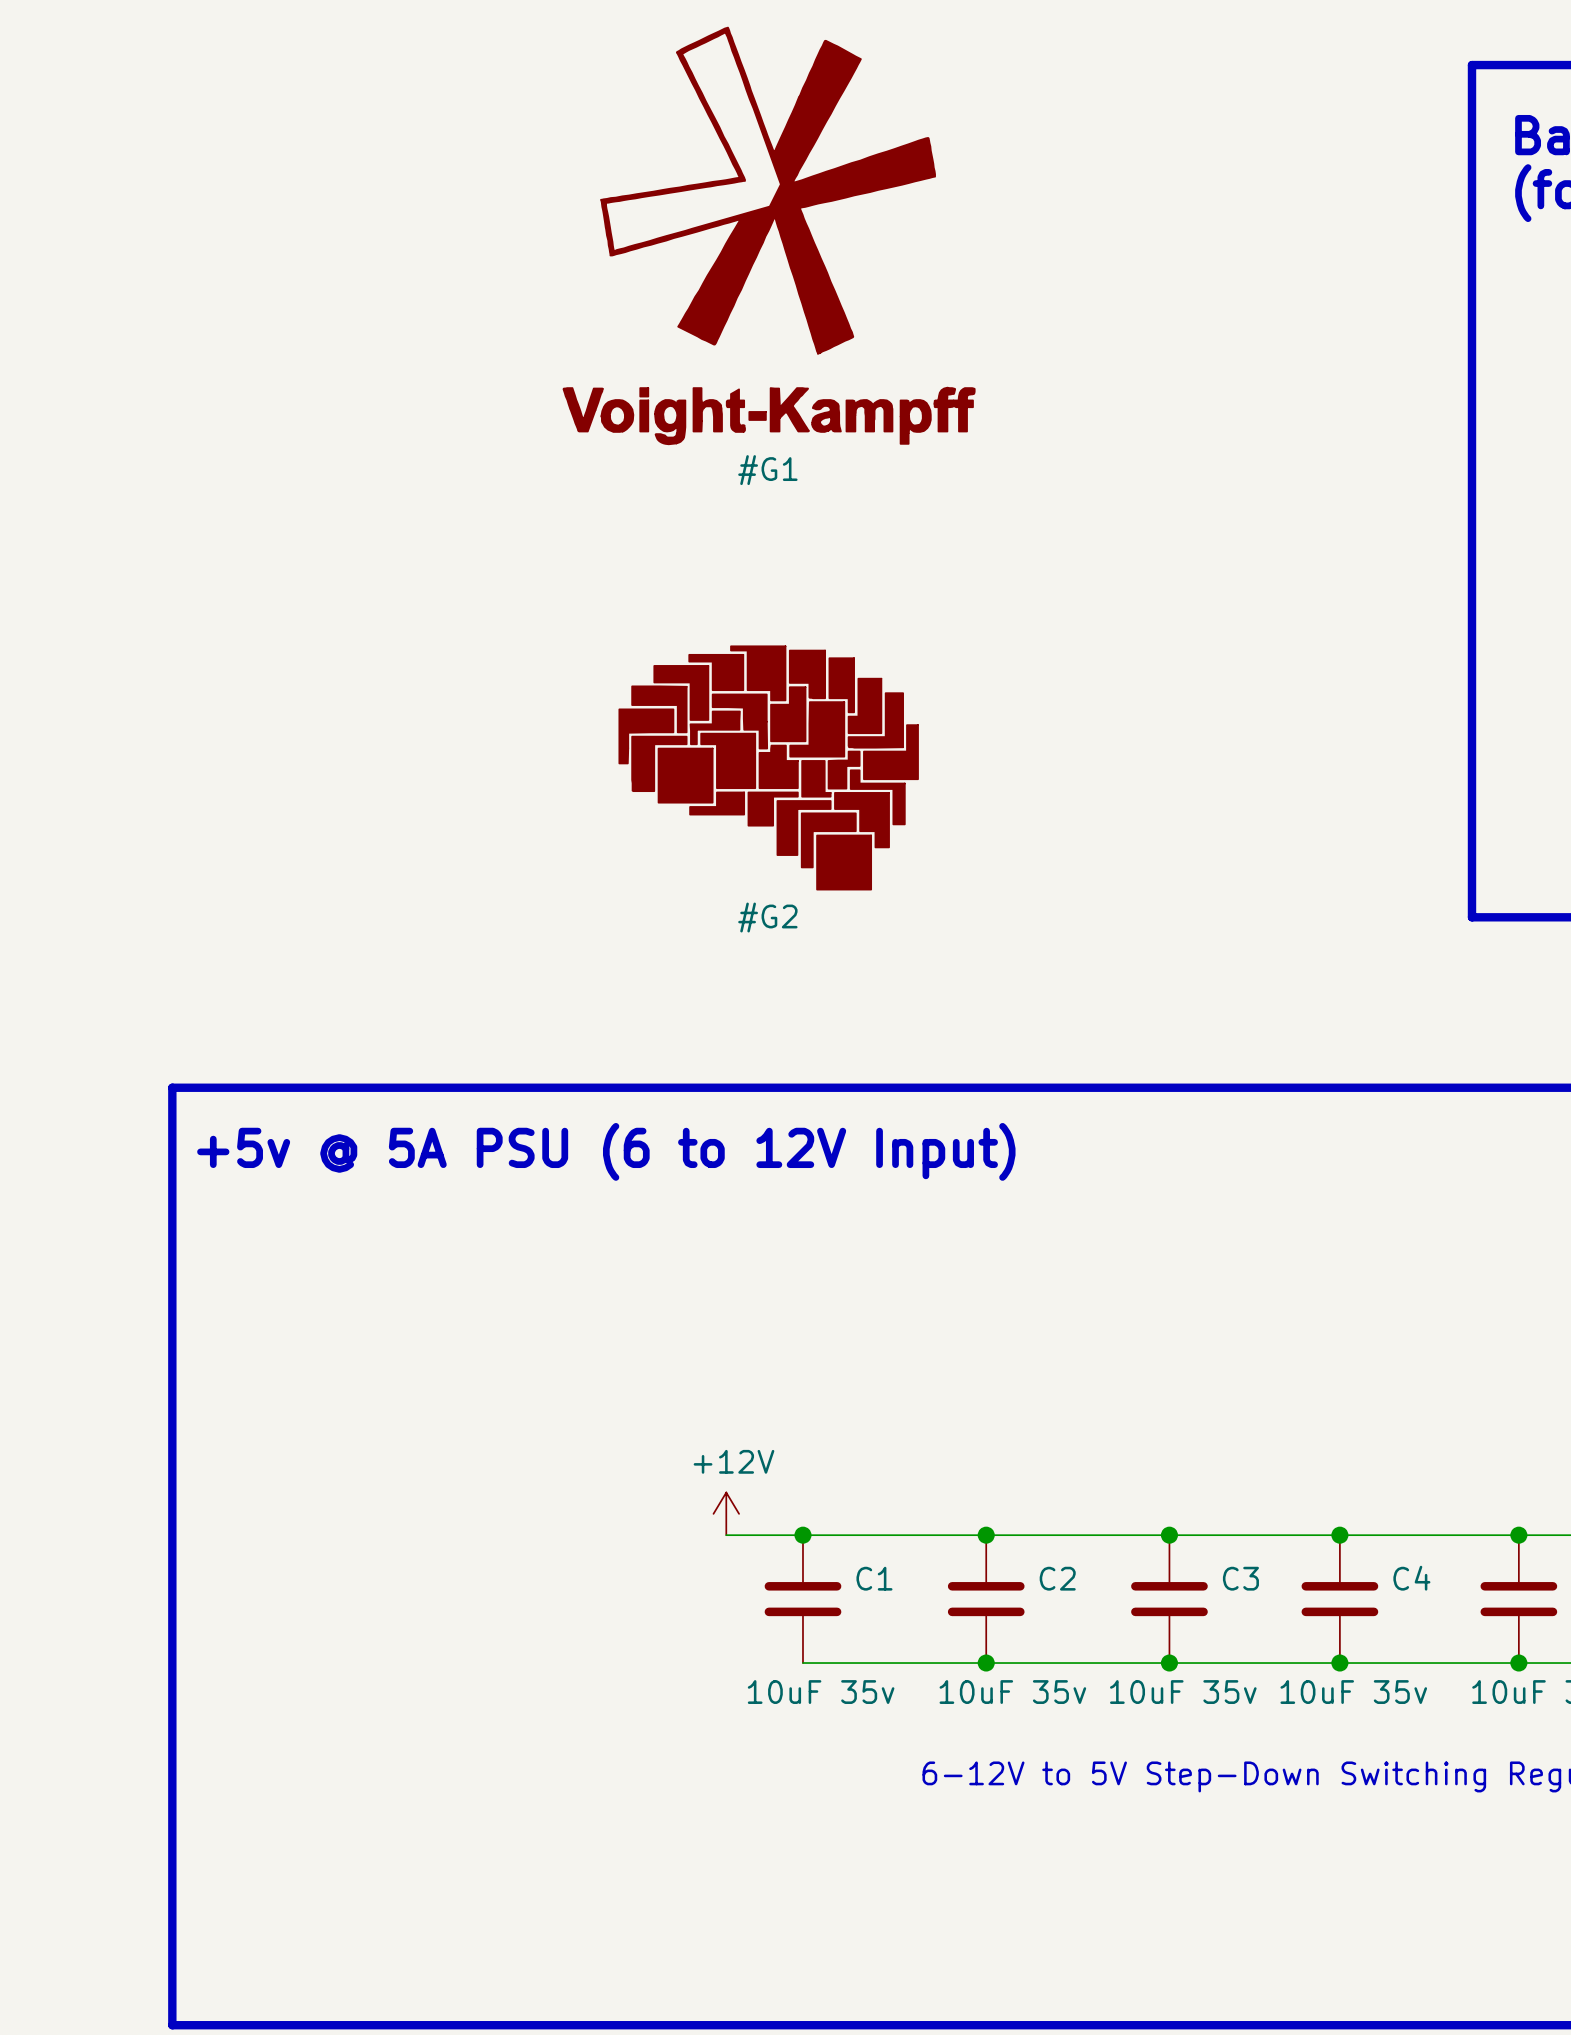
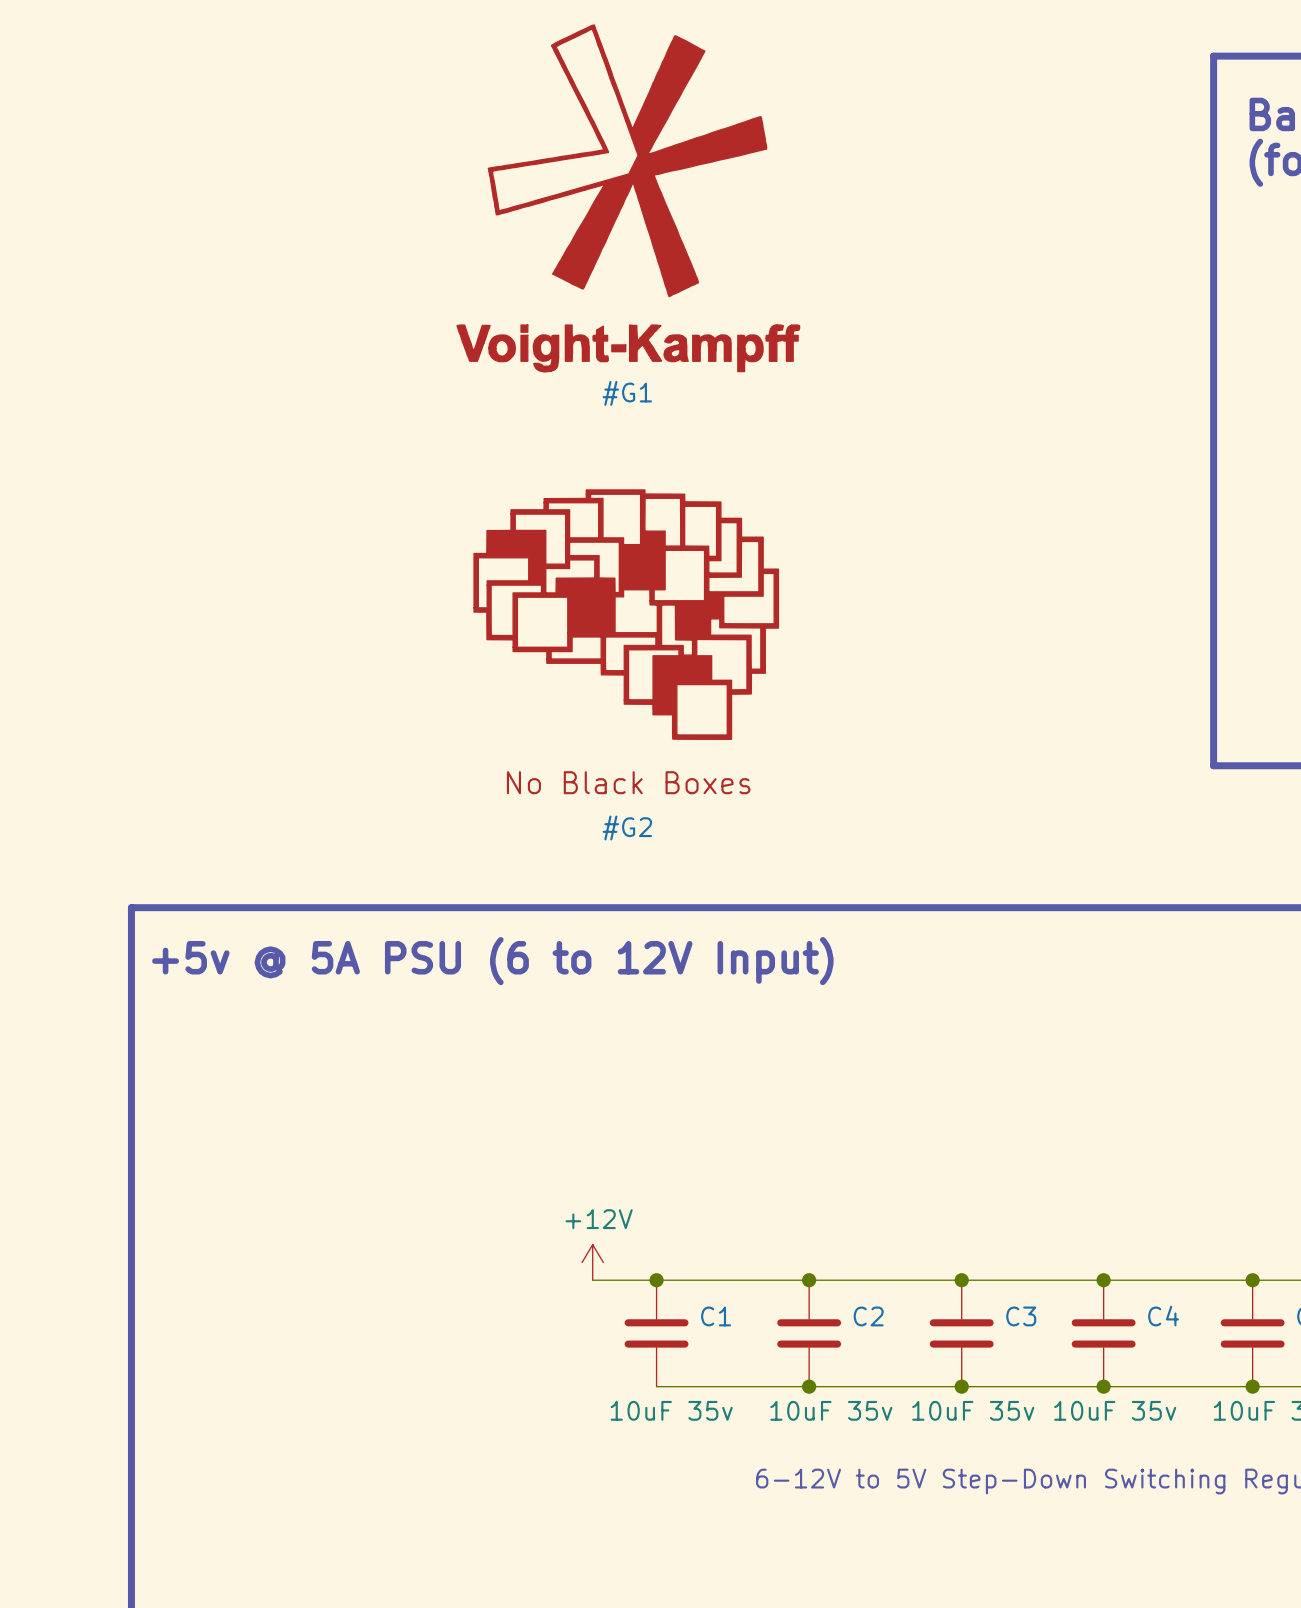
#G2 shape: [619, 646, 919, 890] -> [473, 489, 779, 740]
#G2 name position: #G2 (767, 917) -> #G2 (627, 828)

